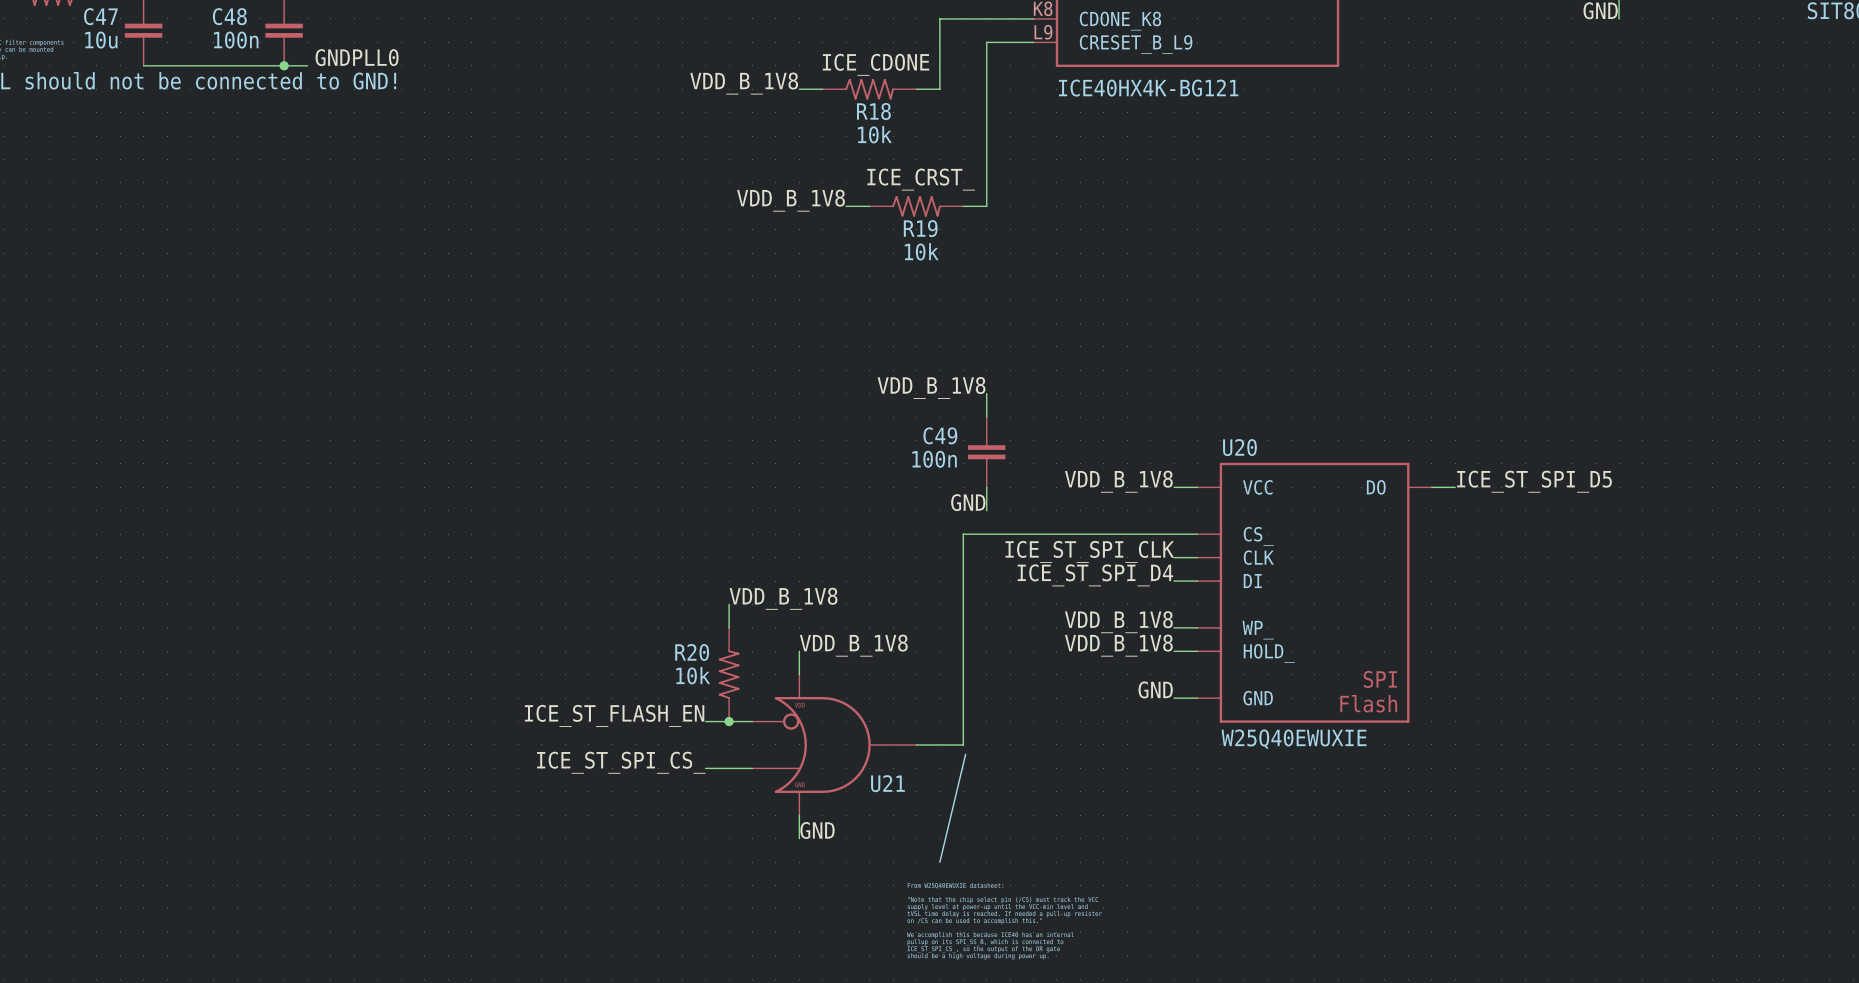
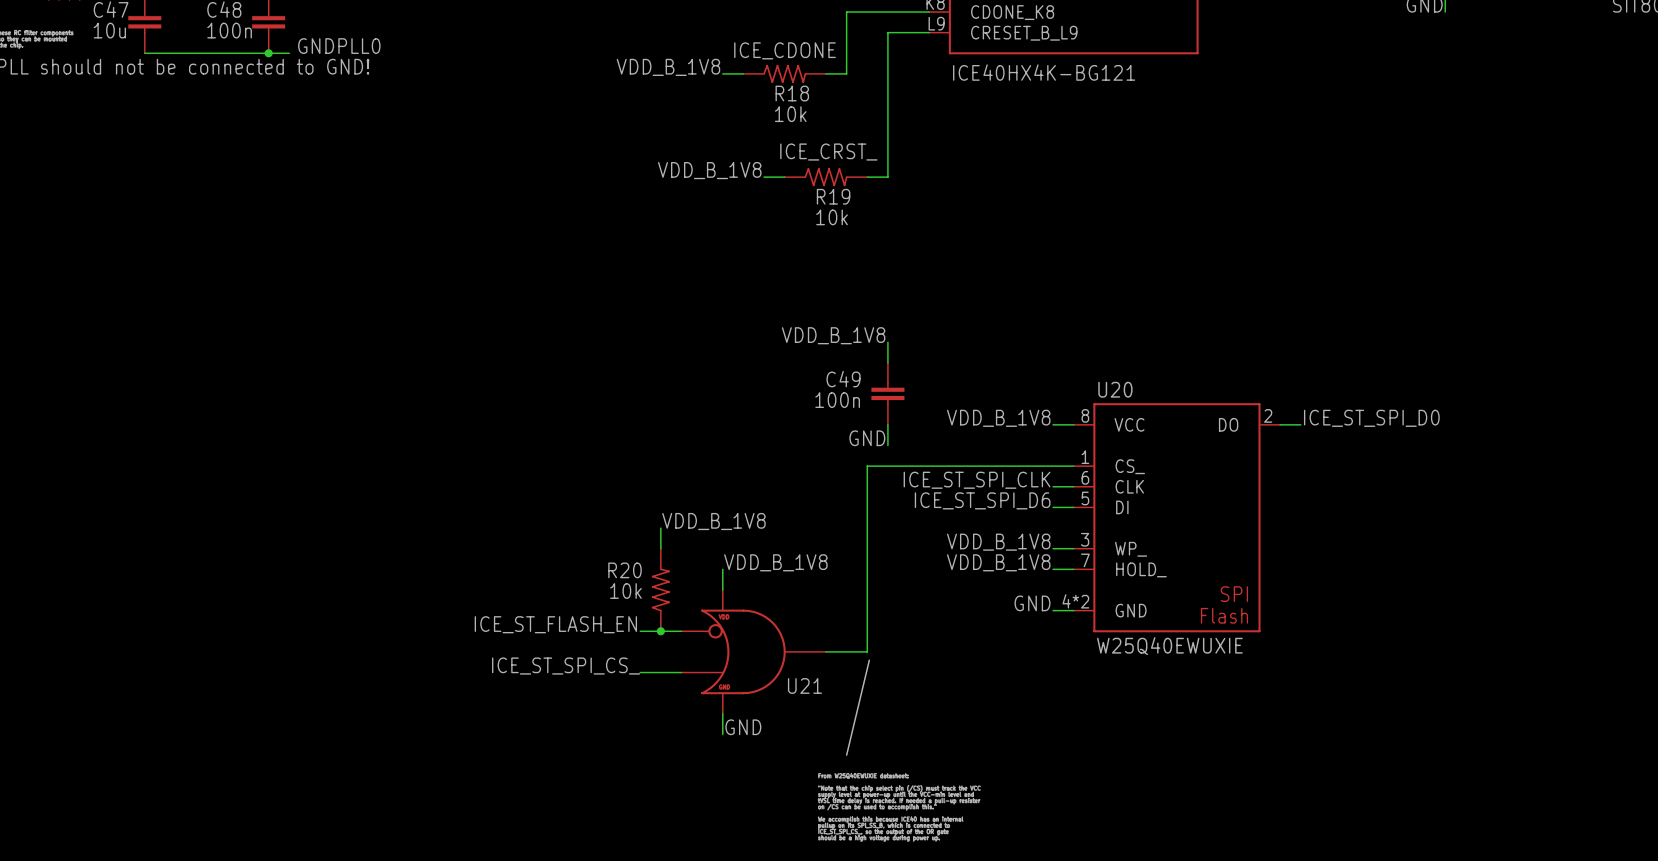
U20 pin number: none -> 8 (1085, 415)
U20 pin number: none -> 2 (1268, 415)
label: ICE_ST_SPI_D5 (1534, 481) -> ICE_ST_SPI_D0 (1371, 418)
U20 pin number: none -> 1 (1085, 457)
U20 pin number: none -> 6 (1085, 477)
U20 pin number: none -> 5 (1085, 498)
label: ICE_ST_SPI_D4 (1095, 575) -> ICE_ST_SPI_D6 (982, 500)
U20 pin number: none -> 3 (1085, 539)
U20 pin number: none -> 7 (1085, 560)
U20 pin number: none -> 4*2 (1075, 601)

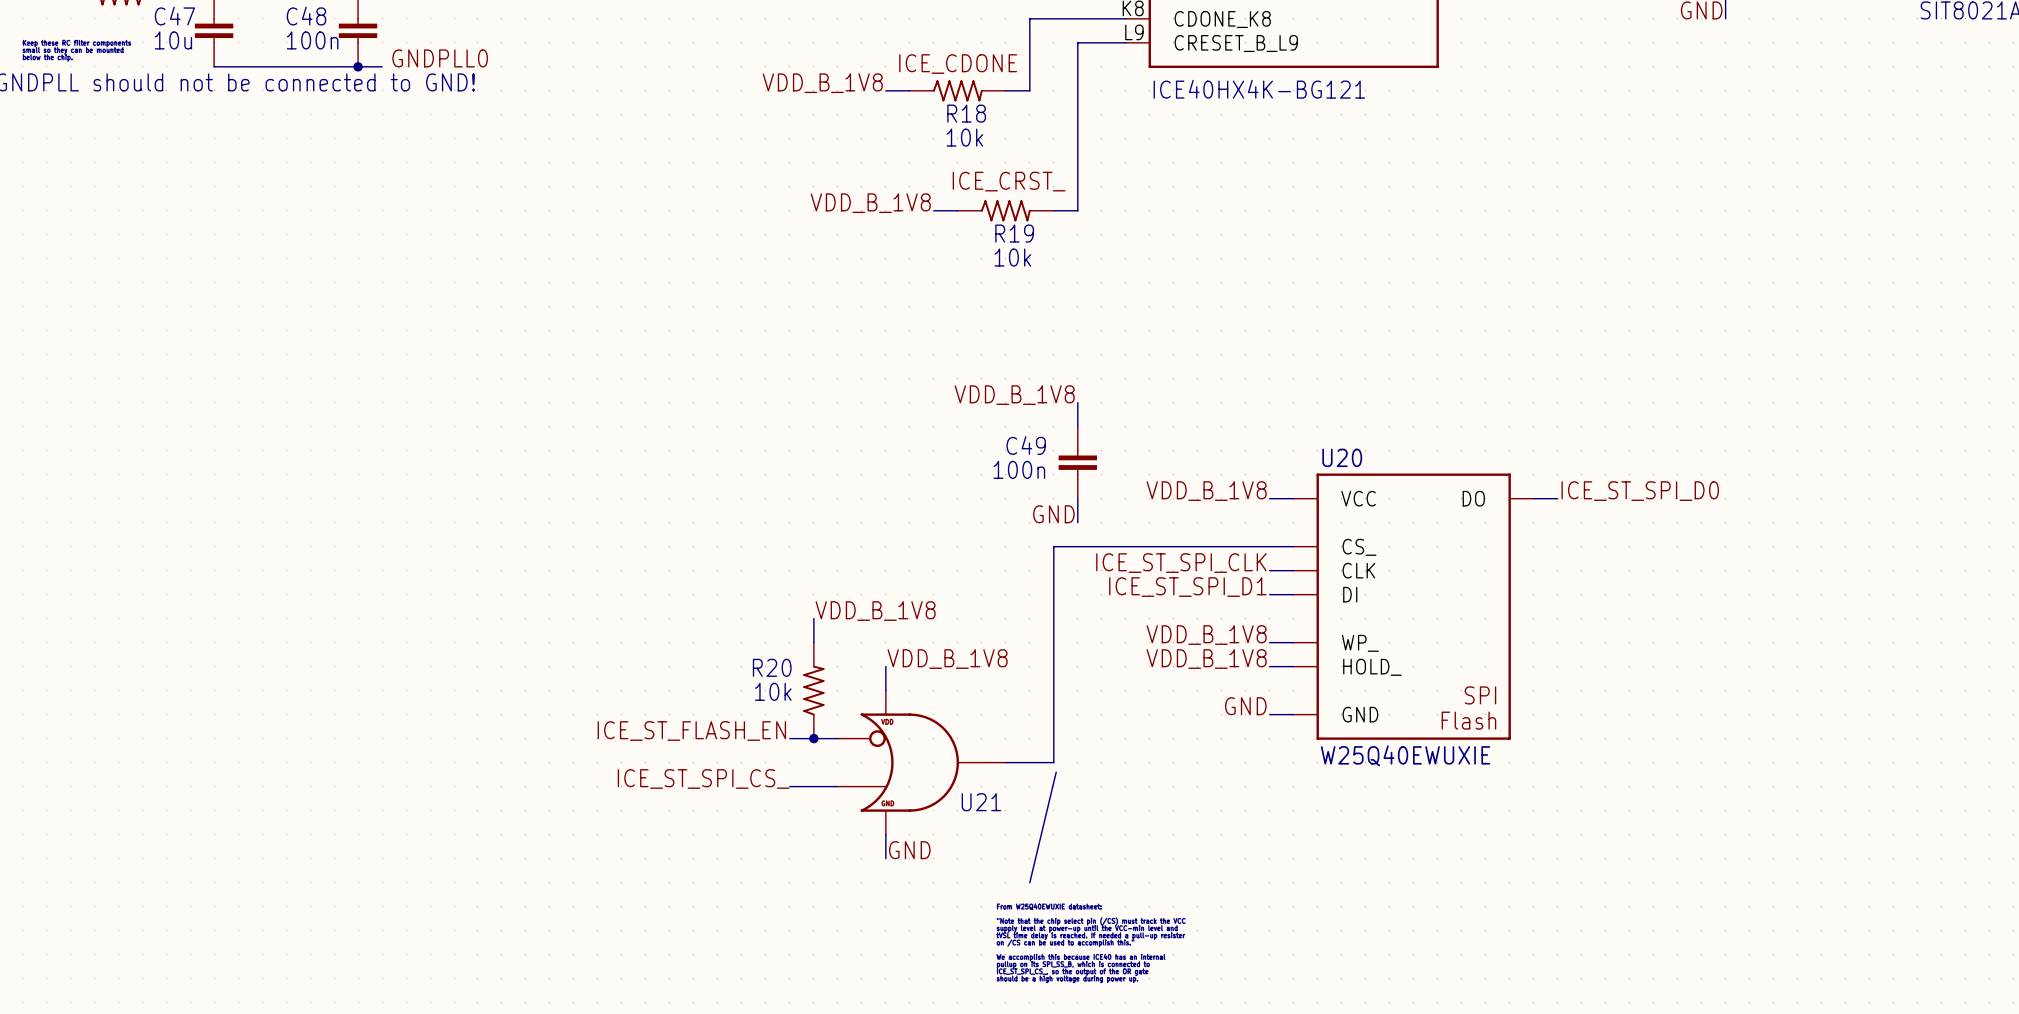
U20 pin number: 8 (1085, 415) -> none
U20 pin number: 2 (1268, 415) -> none
U20 pin number: 1 (1085, 457) -> none
U20 pin number: 6 (1085, 477) -> none
U20 pin number: 5 (1085, 498) -> none
label: ICE_ST_SPI_D6 (982, 500) -> ICE_ST_SPI_D1 (1187, 587)
U20 pin number: 3 (1085, 539) -> none
U20 pin number: 7 (1085, 560) -> none
U20 pin number: 4*2 (1075, 601) -> none

